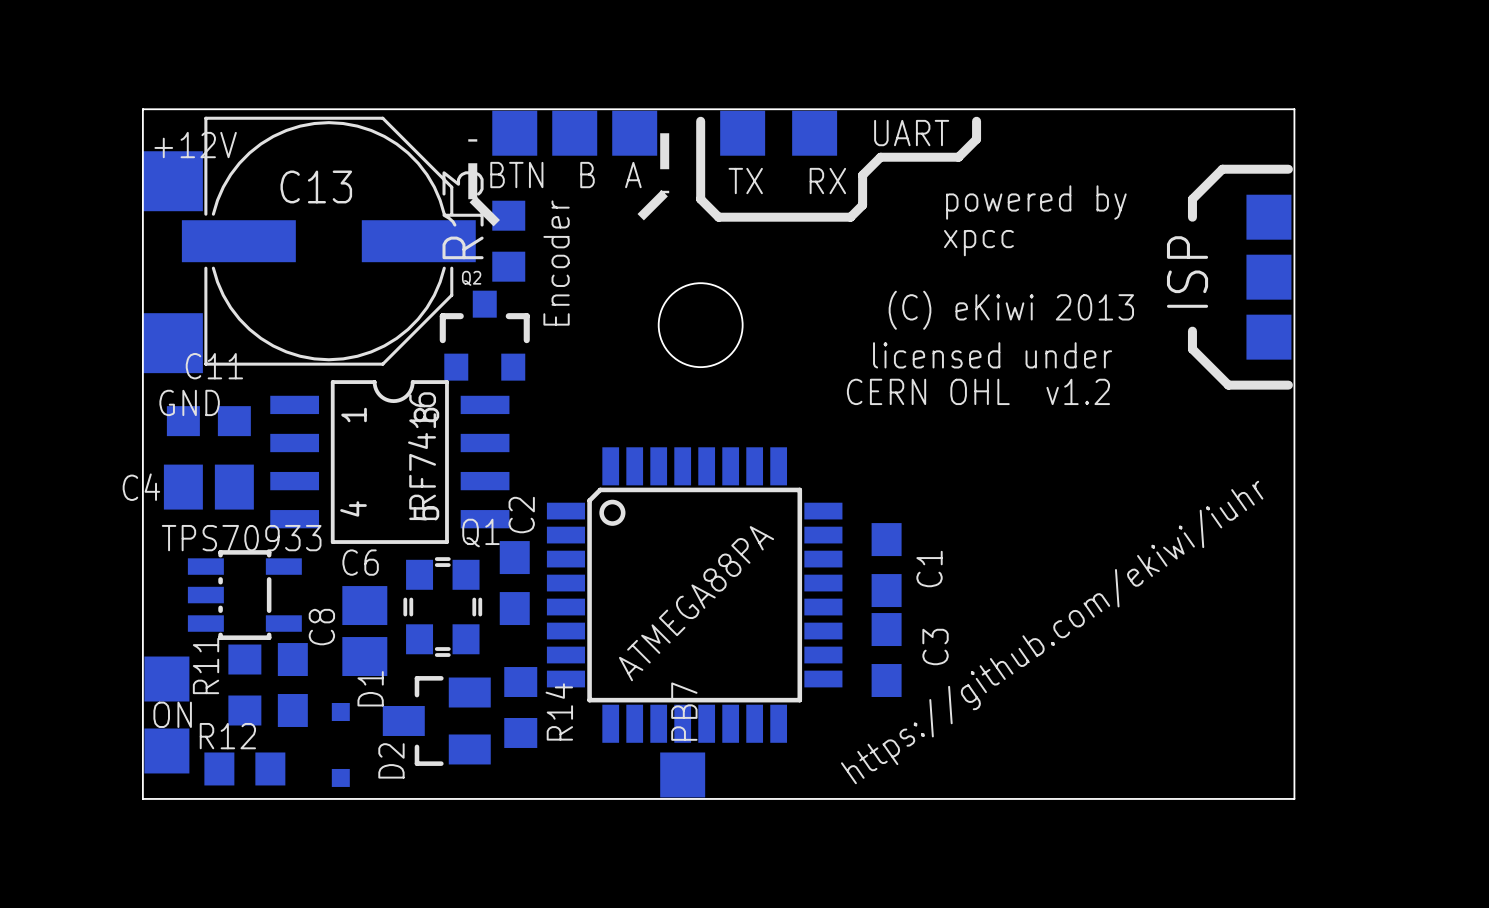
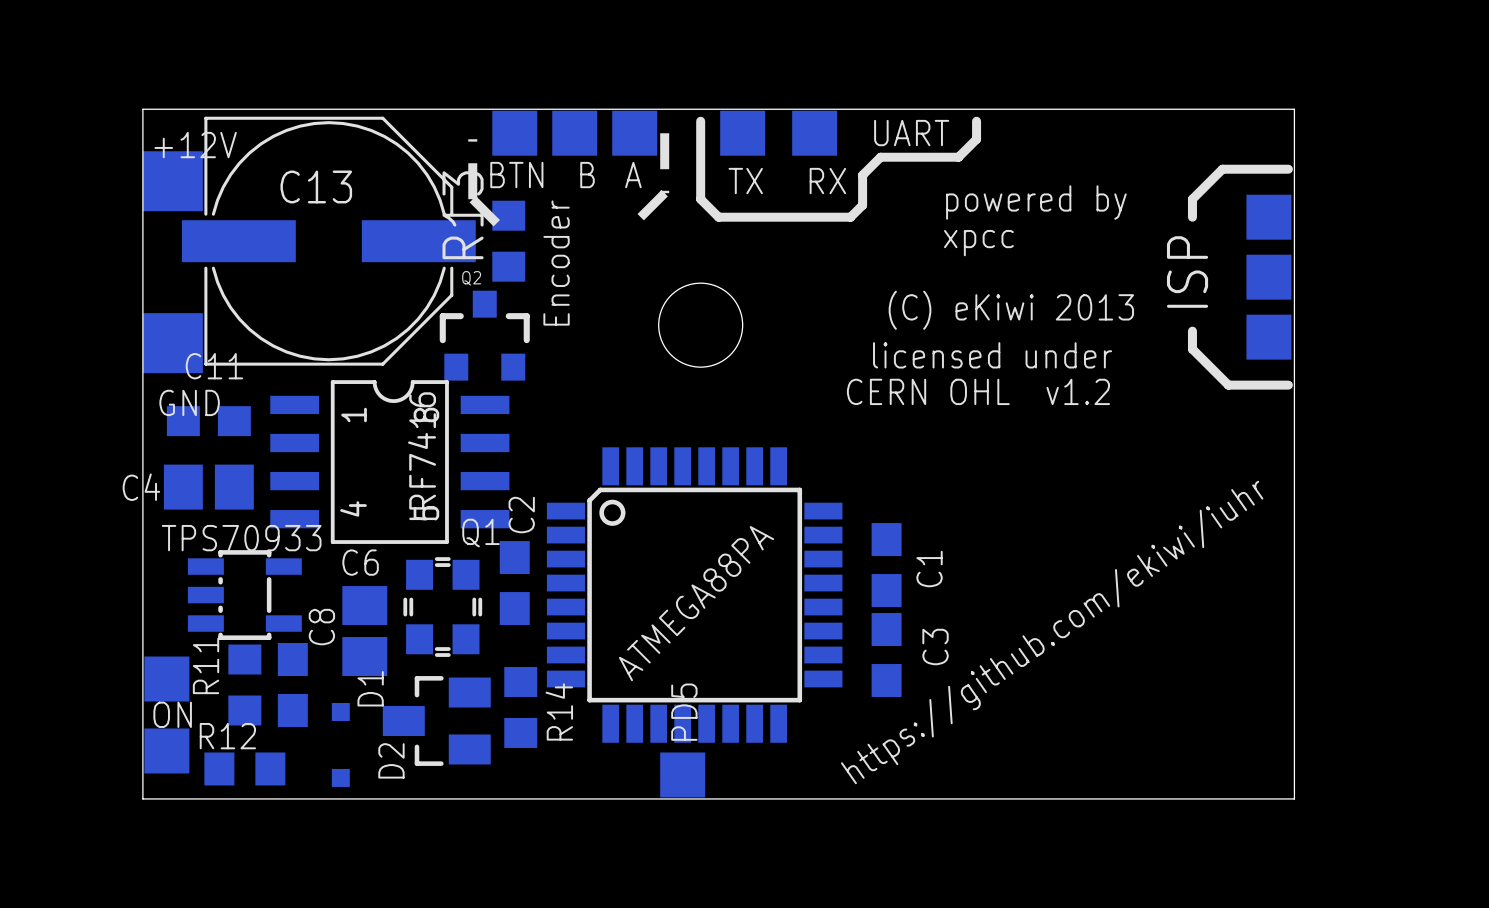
PB7 name: PB7 (684, 711) -> PD5 (684, 712)

